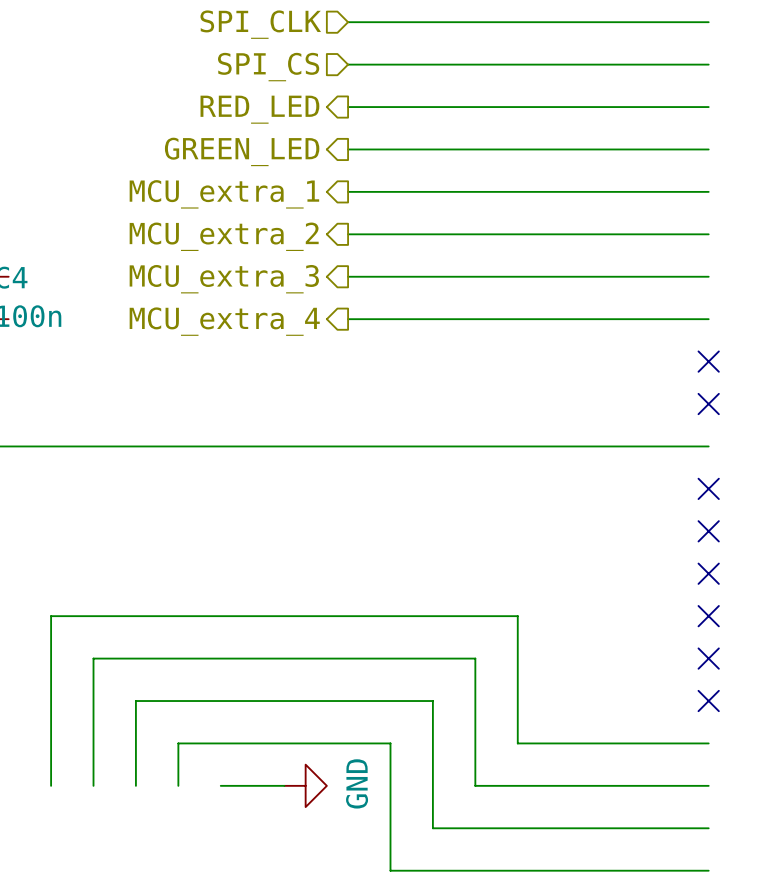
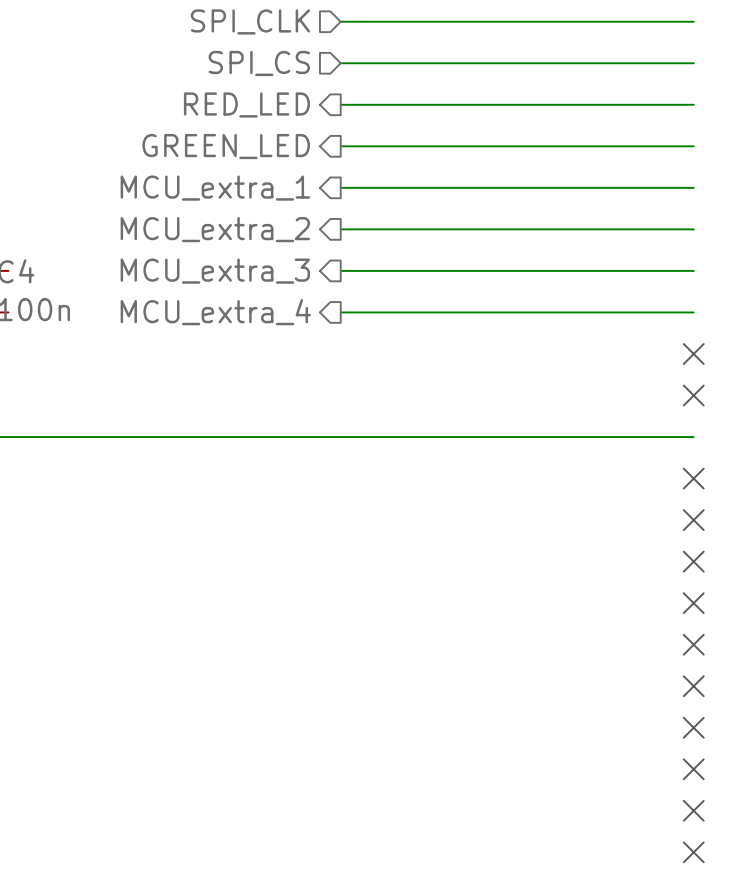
wire: (708, 743) (517, 743) (517, 616) (51, 616) (51, 785) -> none
no-connect mark: none -> (693, 727)
wire: (93, 785) (93, 658) (475, 658) (475, 785) (708, 785) -> none
wire: (135, 785) (135, 701) (432, 701) (432, 828) (708, 828) -> none
wire: (178, 785) (178, 743) (390, 743) (390, 870) (708, 870) -> none
wire: (220, 785) (284, 785) -> none
power symbol: GND (305, 785) -> none
no-connect mark: none -> (693, 769)
no-connect mark: none -> (693, 810)
no-connect mark: none -> (693, 852)

